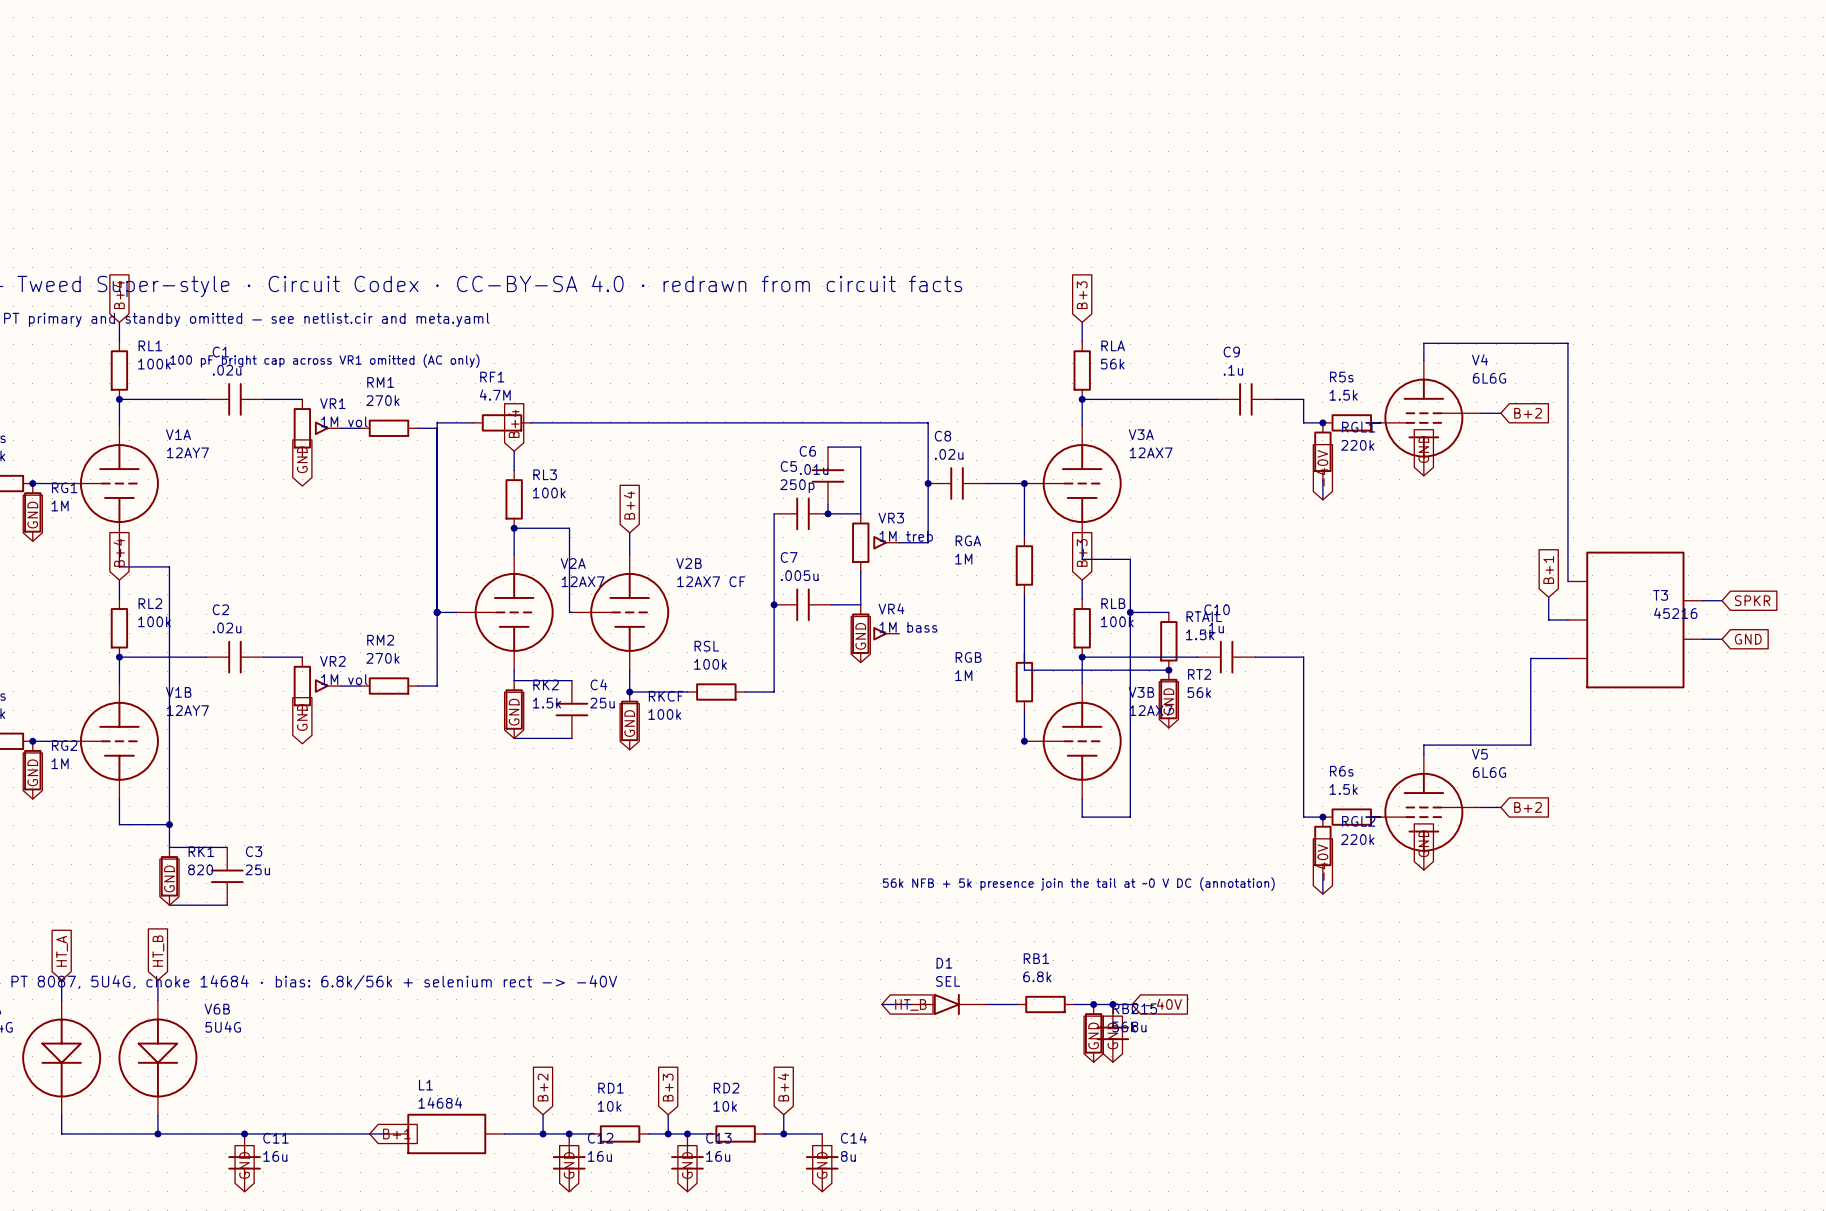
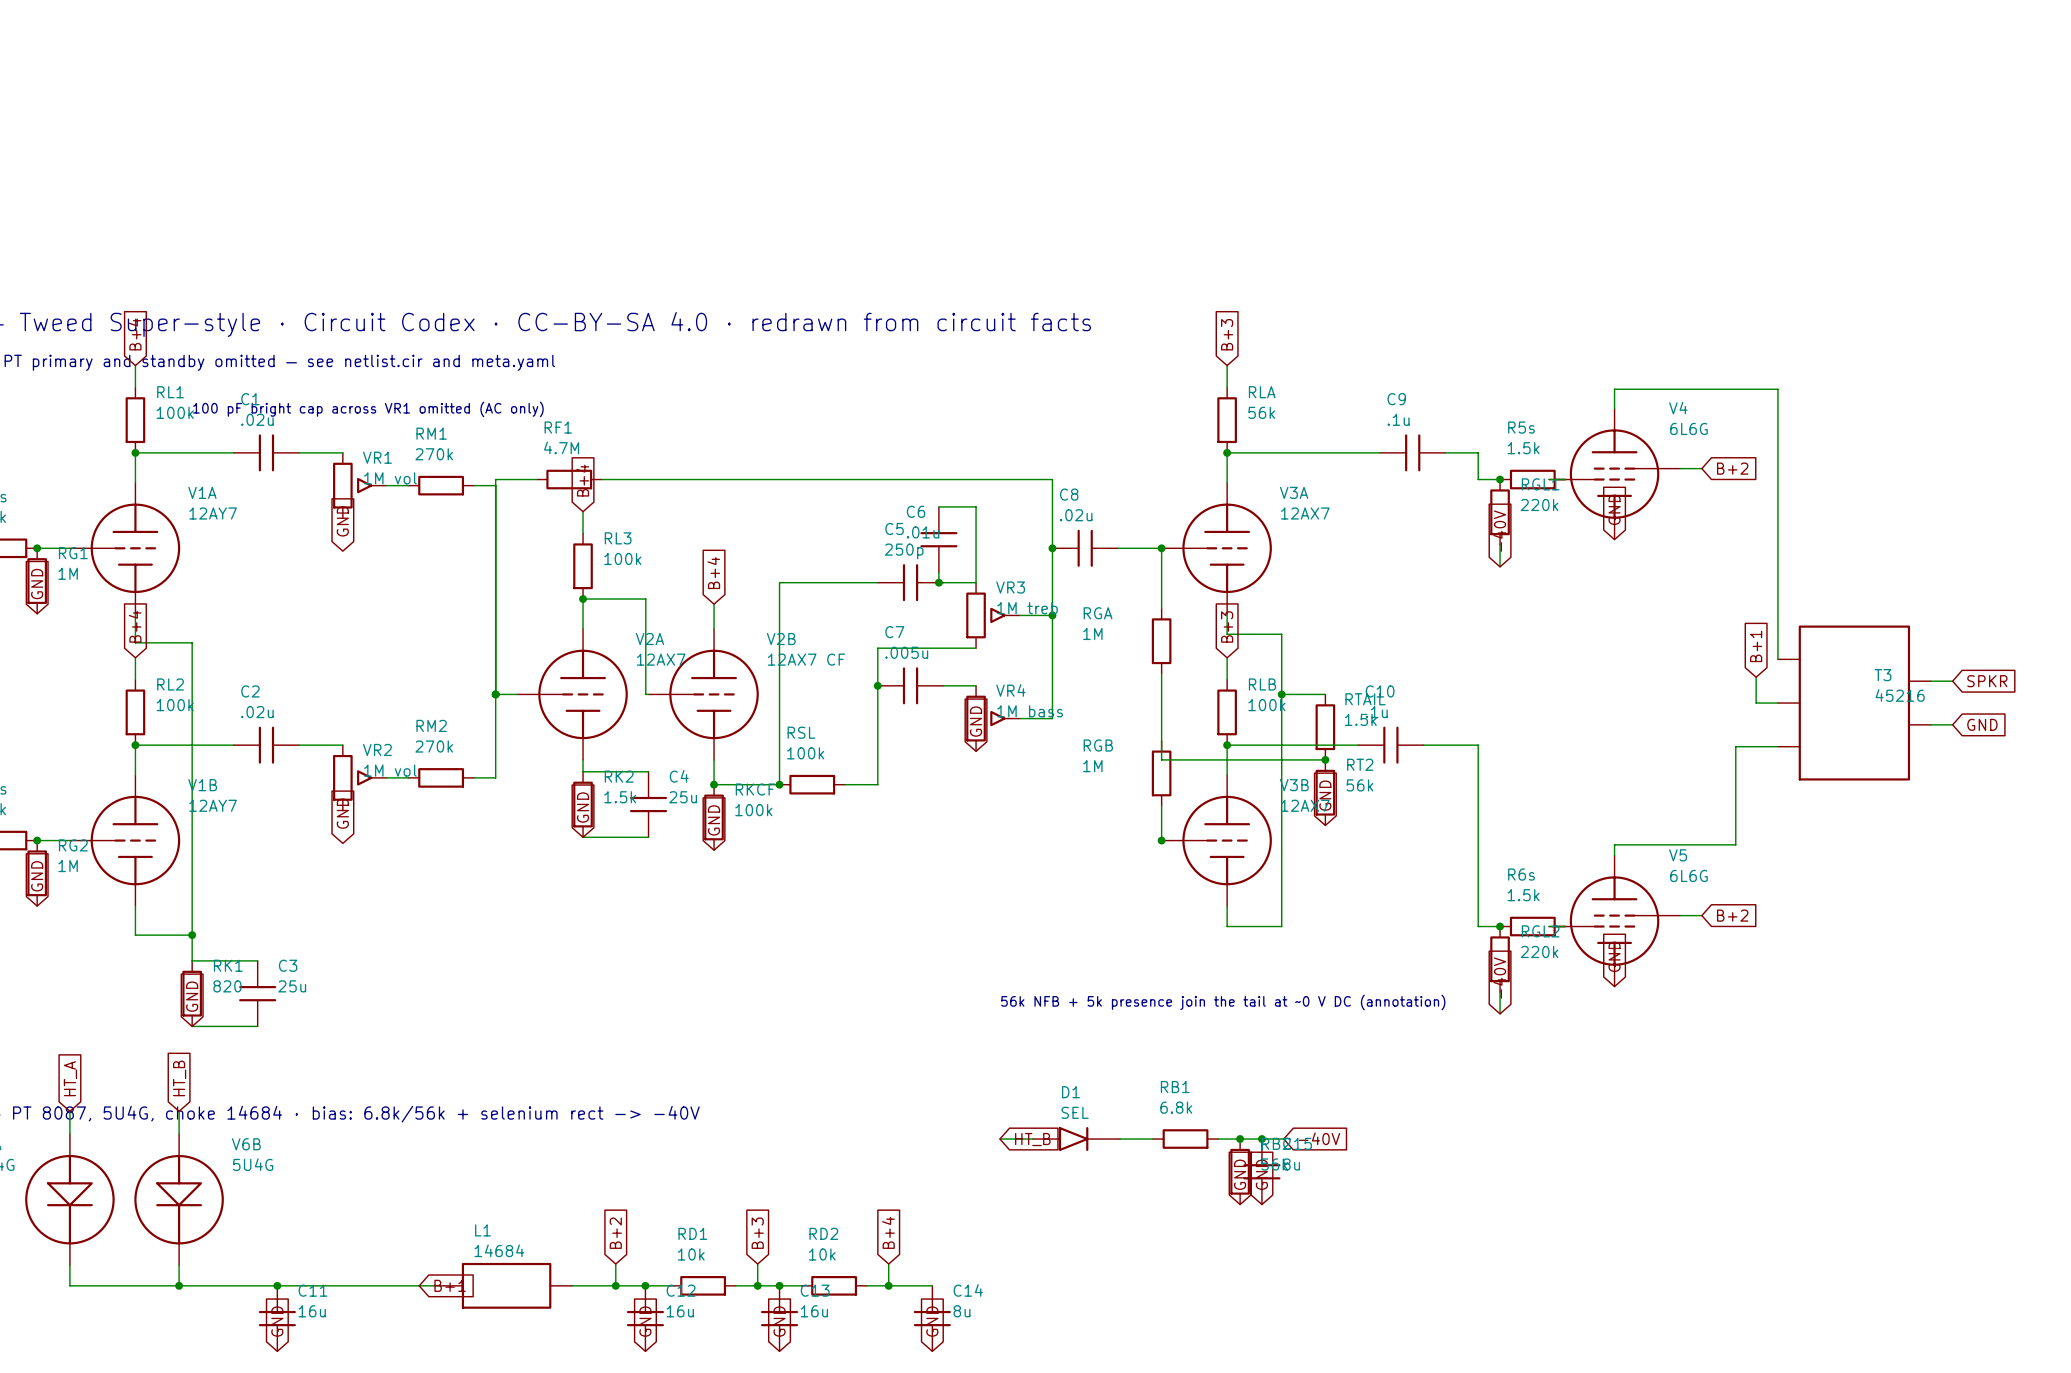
wire: (774, 513) (774, 571) -> (877, 582) (779, 582) (779, 784)
wire: none -> (1052, 615) (1052, 718) (1019, 718)
junction: none -> (1052, 615)
wire: (860, 571) (860, 604) -> (976, 648) (877, 648)
junction: none -> (779, 784)

